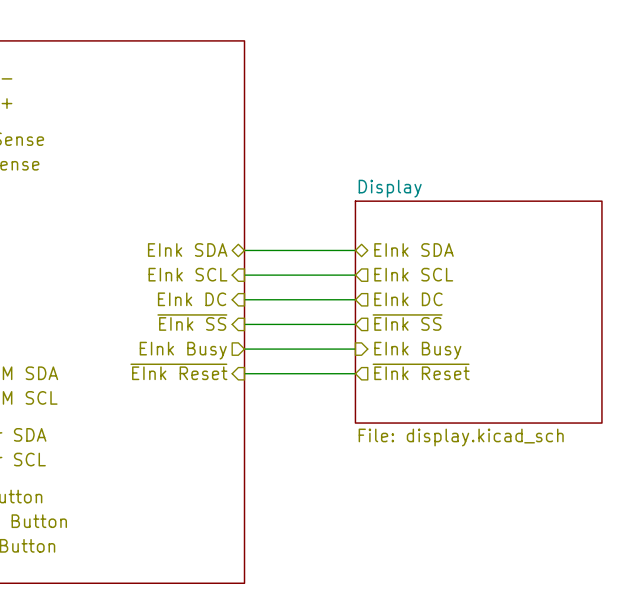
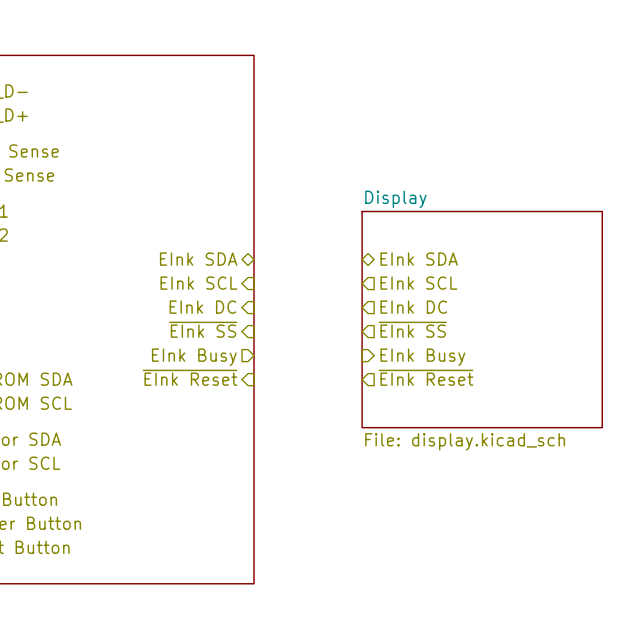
wire: (244, 250) (355, 250) -> none
wire: (244, 275) (355, 275) -> none
wire: (244, 299) (355, 299) -> none
wire: (244, 324) (355, 324) -> none
wire: (244, 349) (355, 349) -> none
wire: (244, 373) (355, 373) -> none

